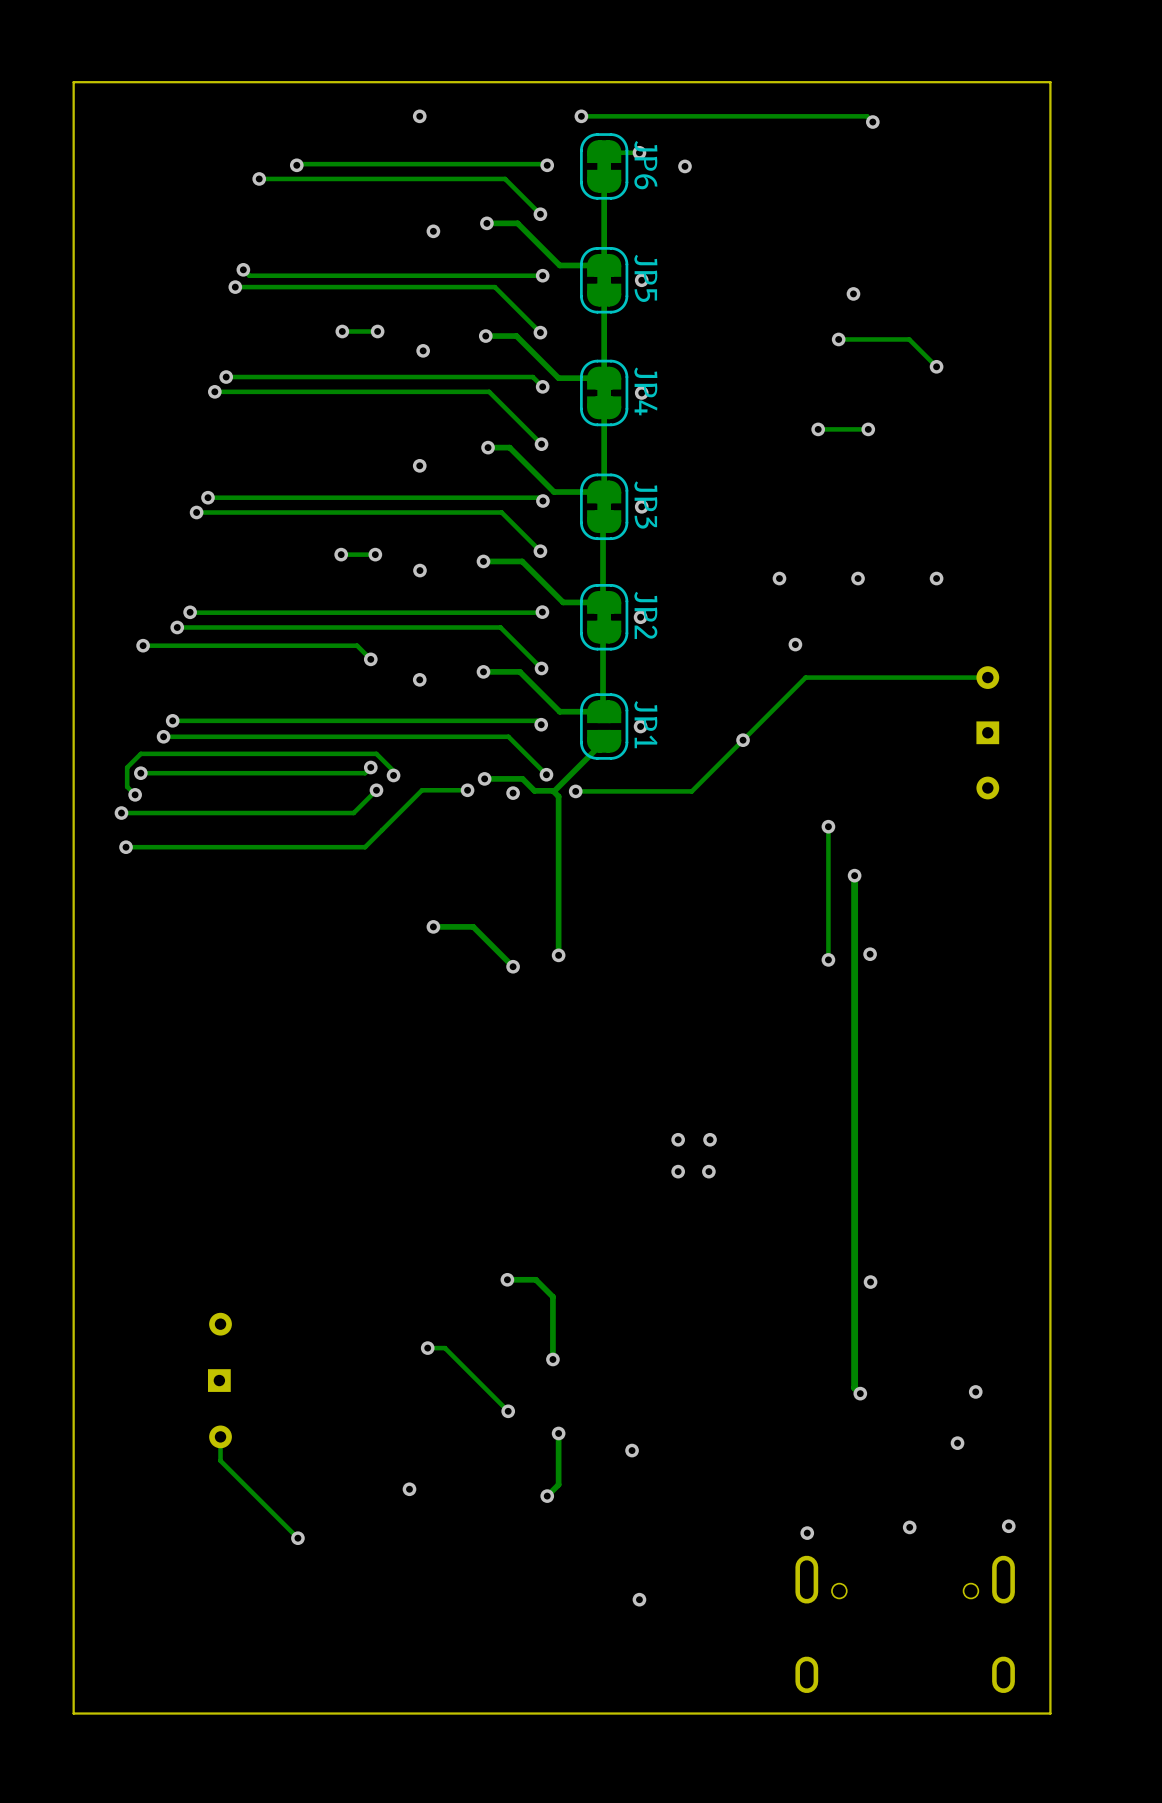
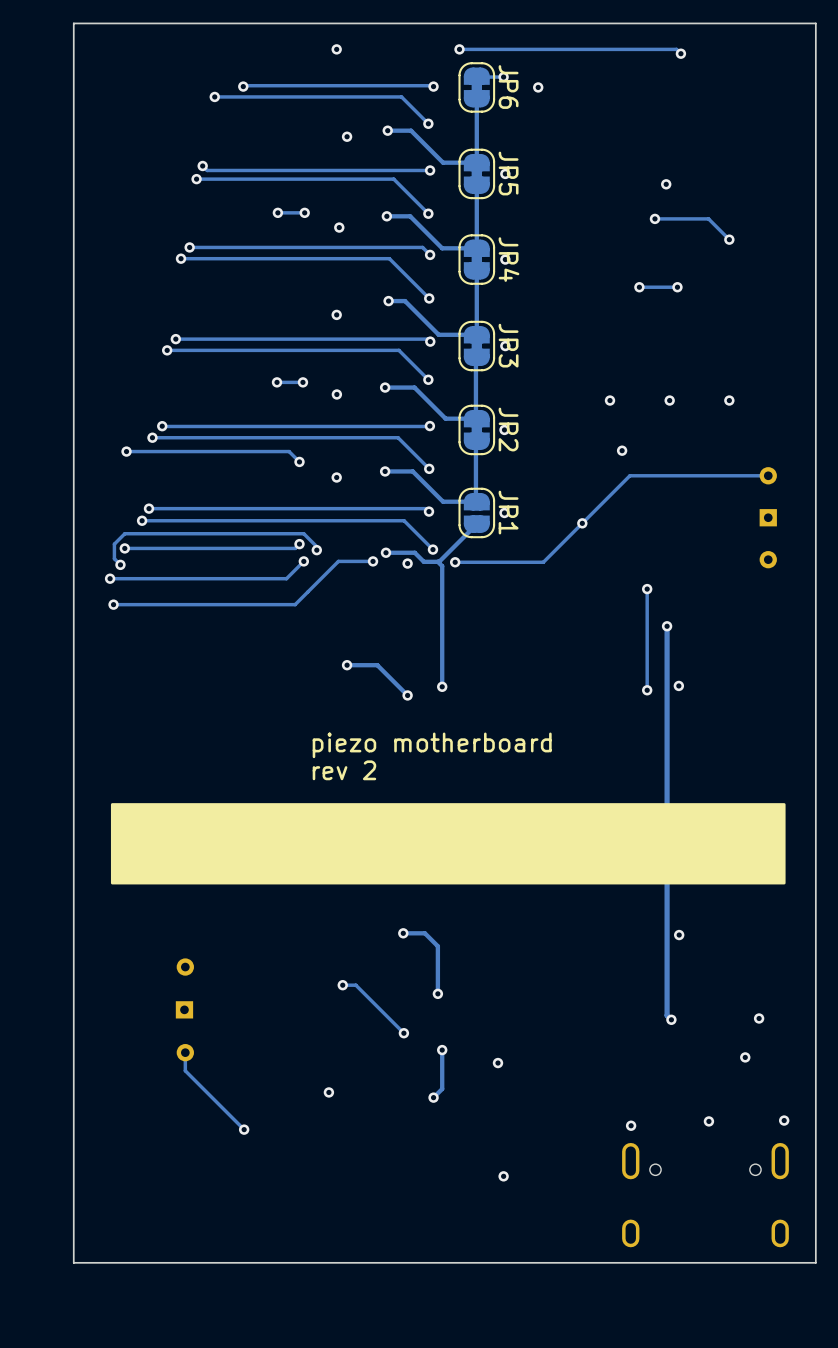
text: none -> piezo motherboard (432, 745)
text: none -> rev 2 (344, 770)
drawing: none -> [110, 803, 786, 885]

